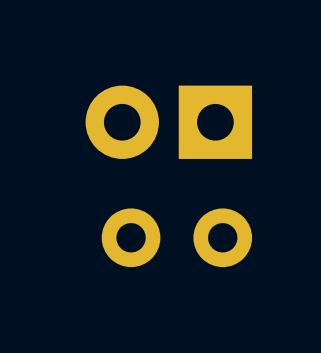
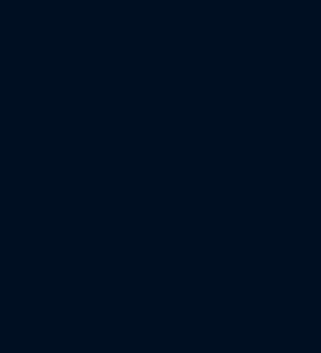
part: (168, 122) -> none
part: (176, 237) -> none

